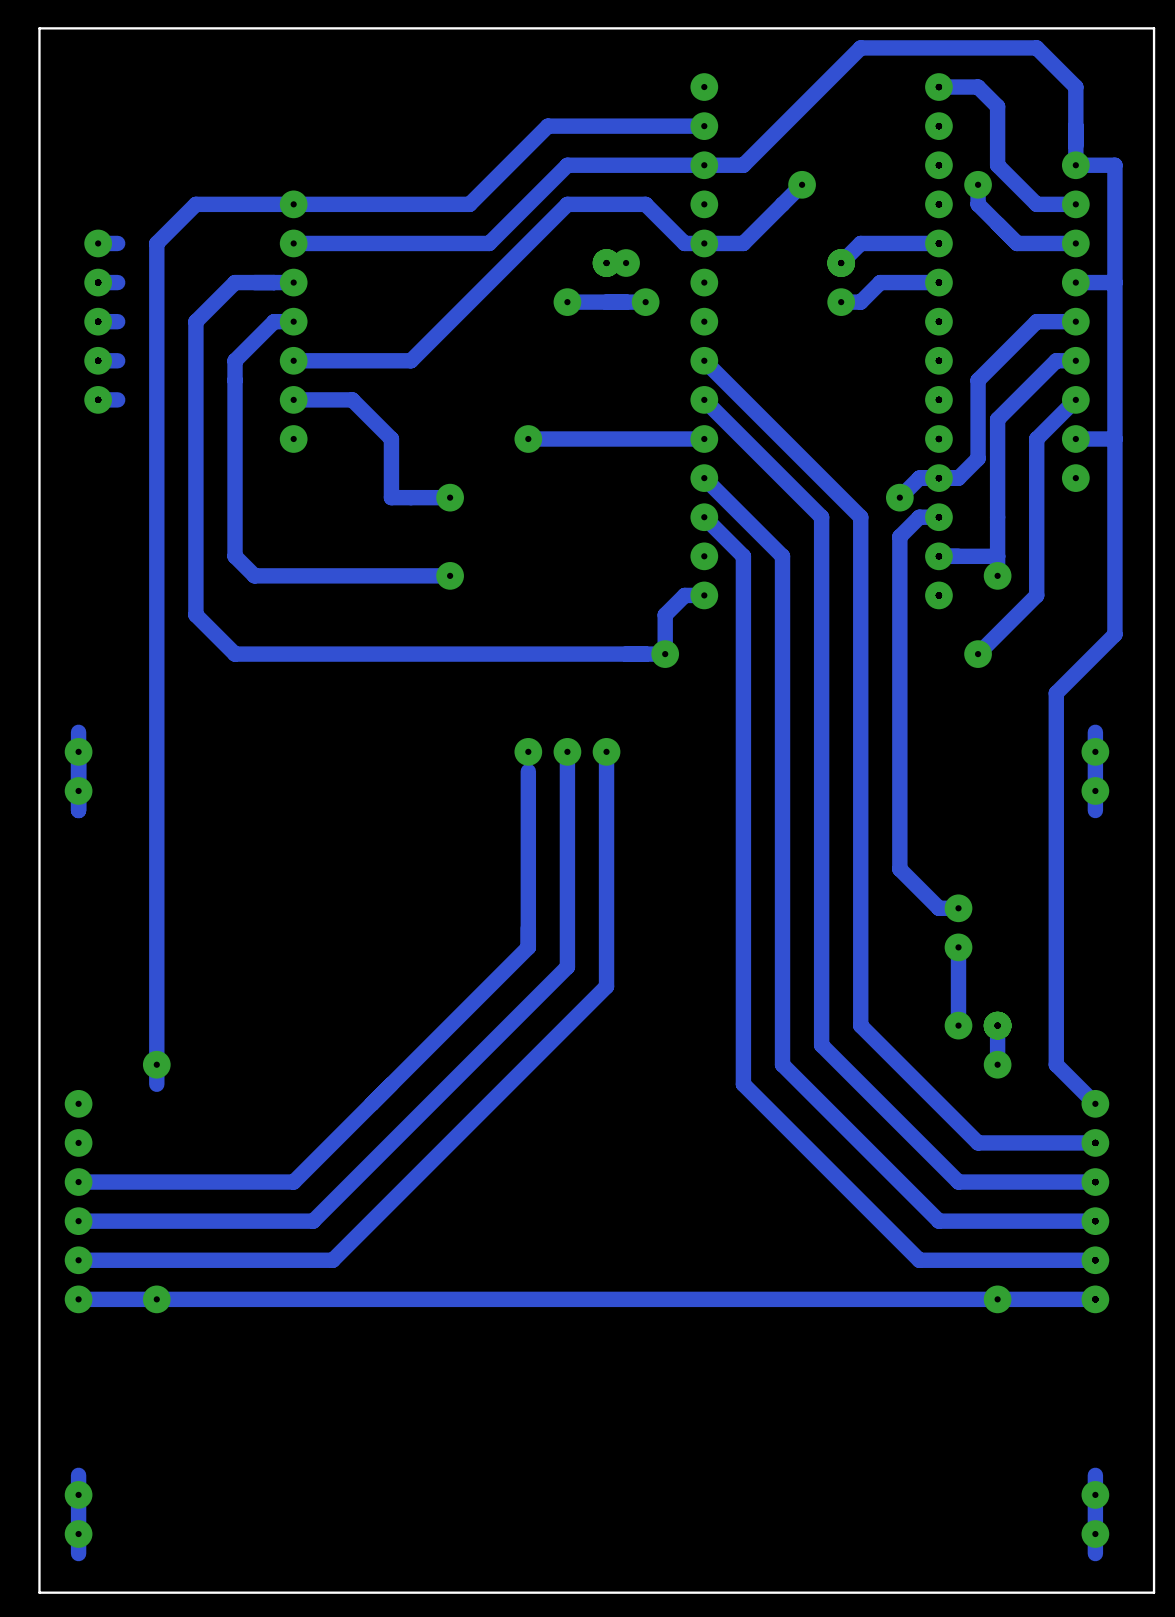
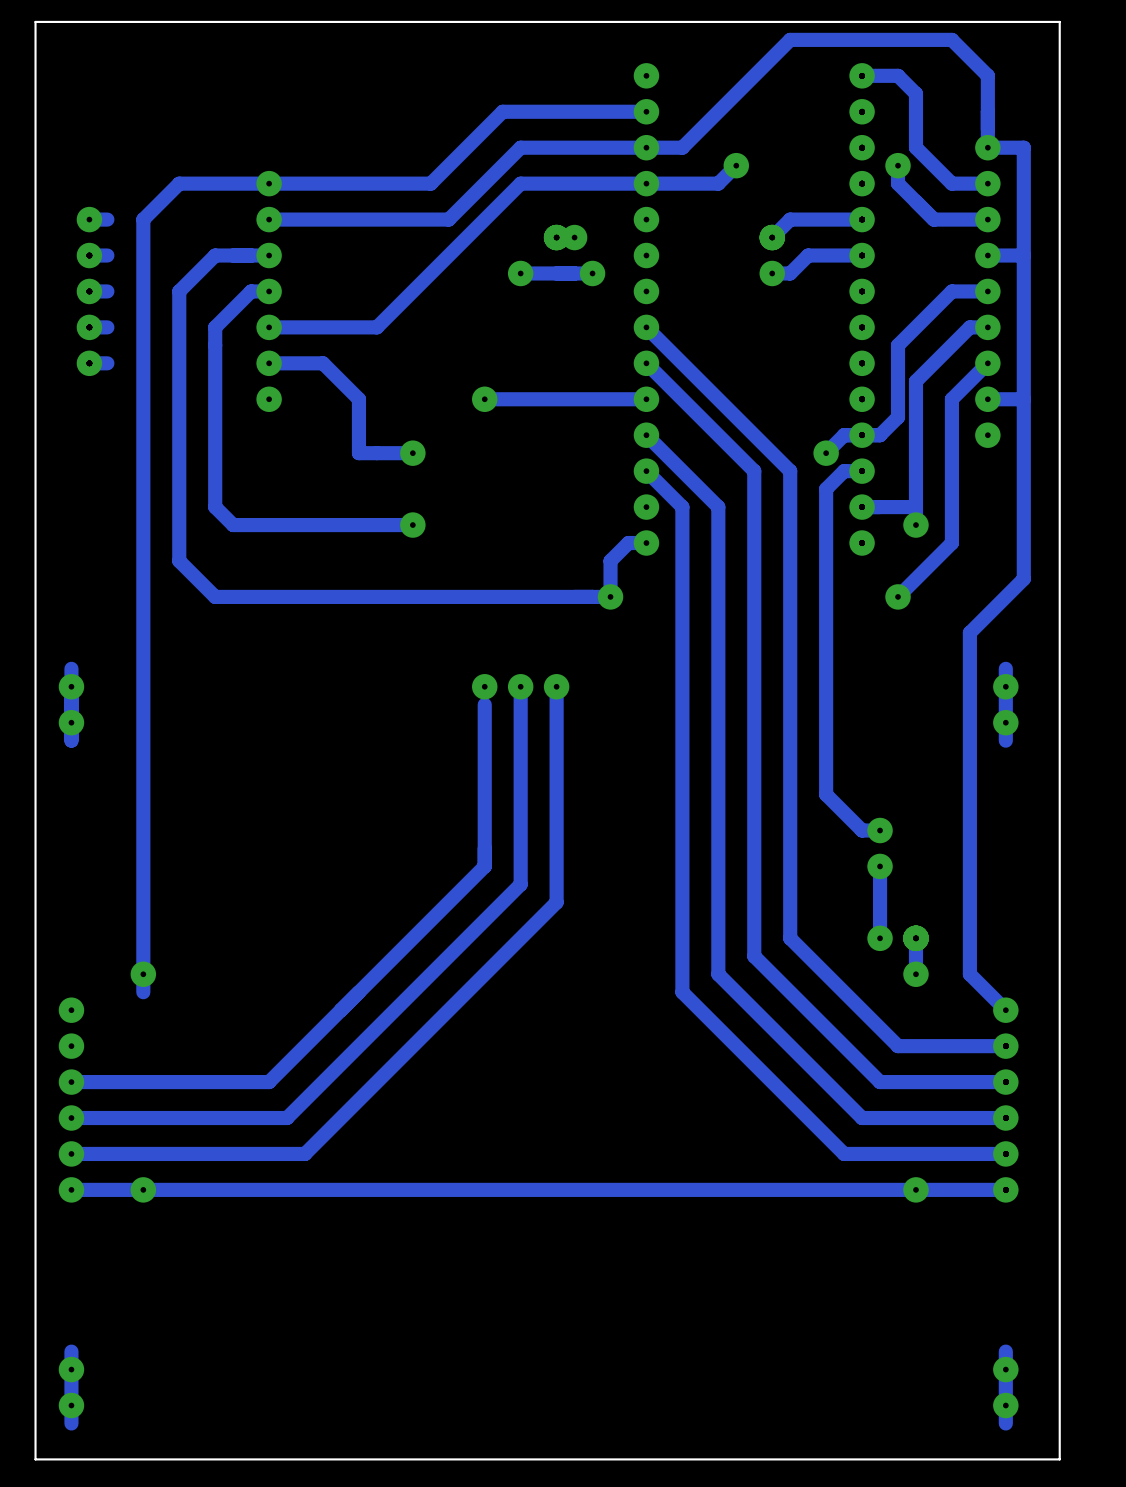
track: (782, 204) (743, 243) (684, 243) (645, 204) -> (718, 183) (592, 183)

